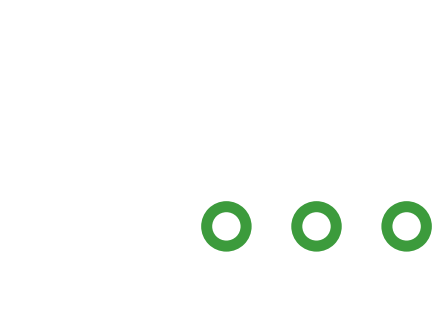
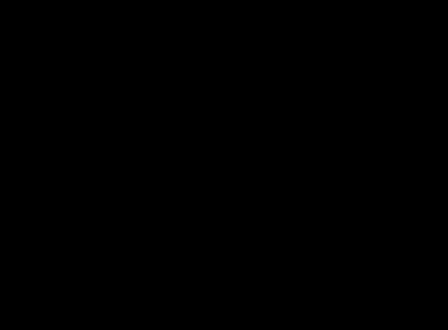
part: (316, 226) -> none

